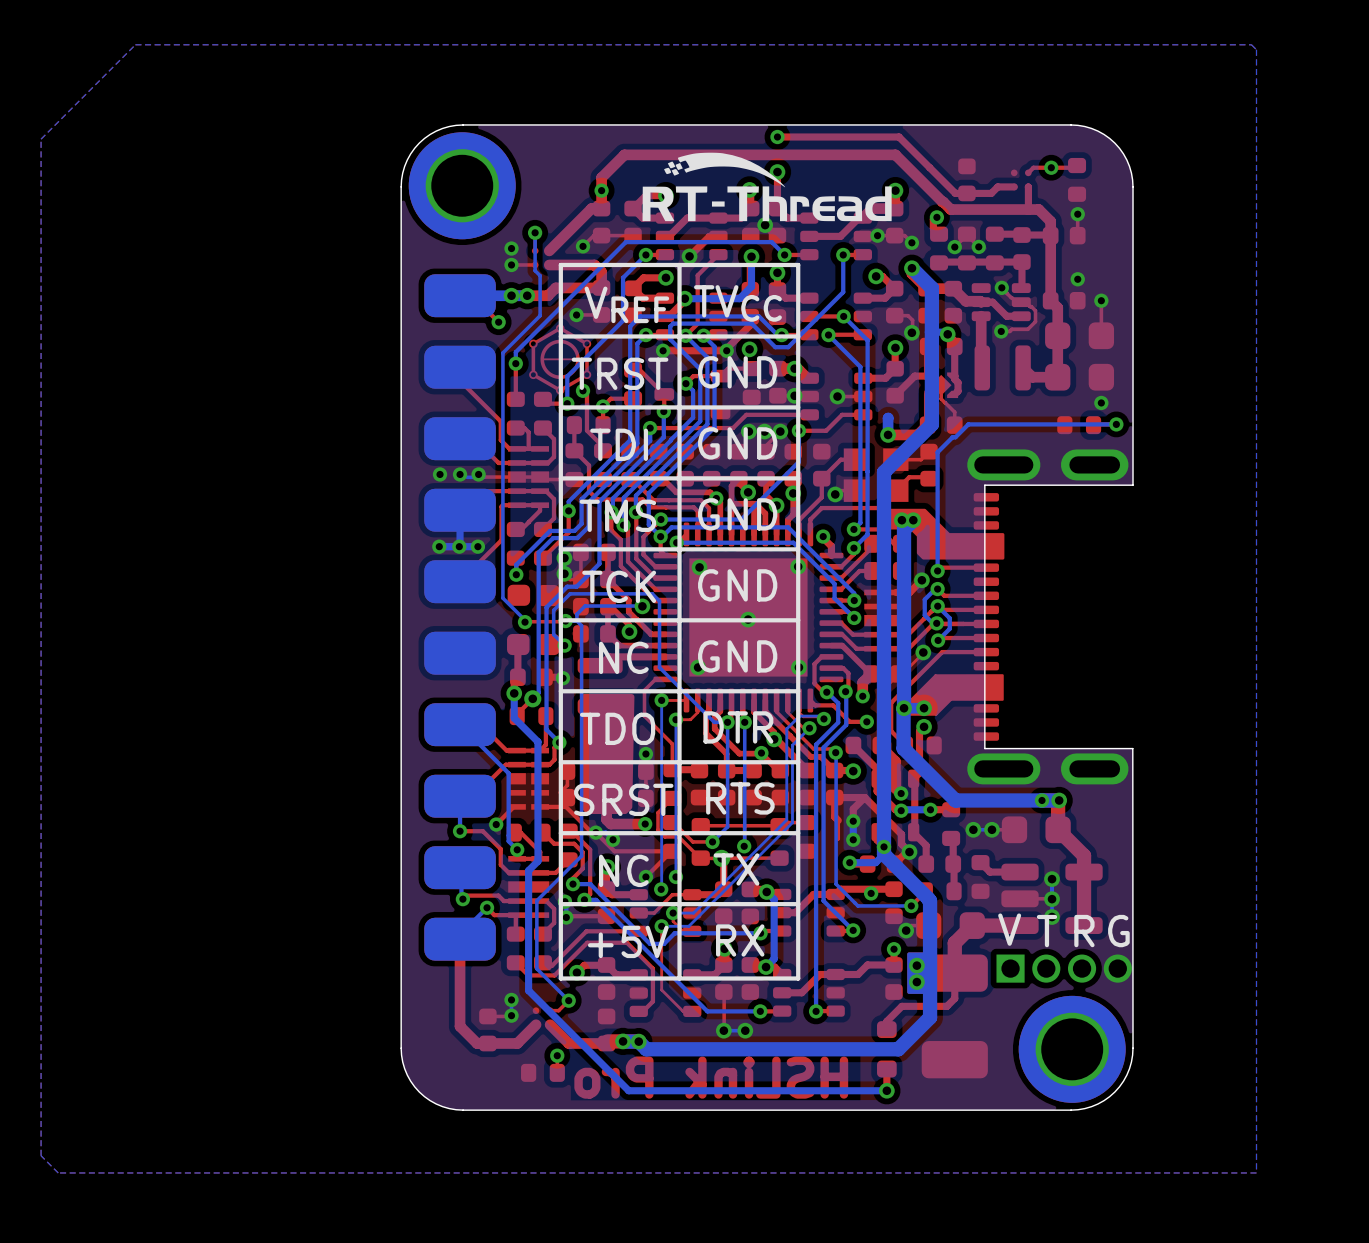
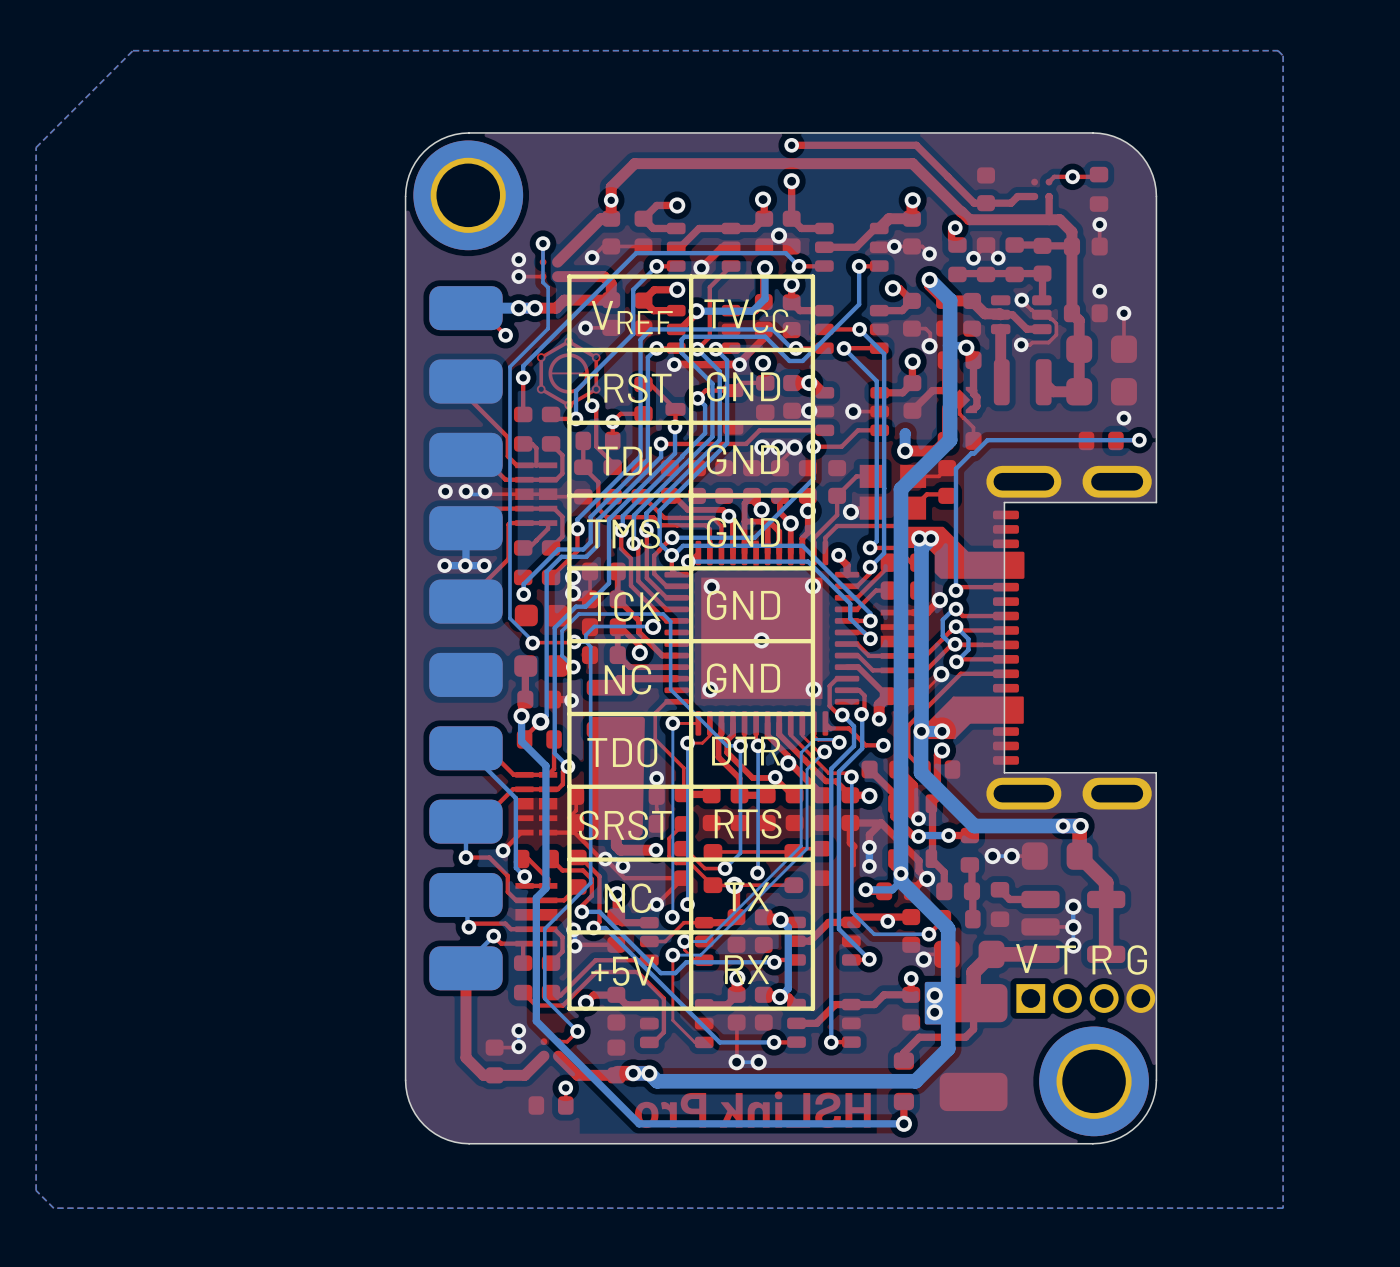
drawing: [642, 152, 892, 222] -> none

